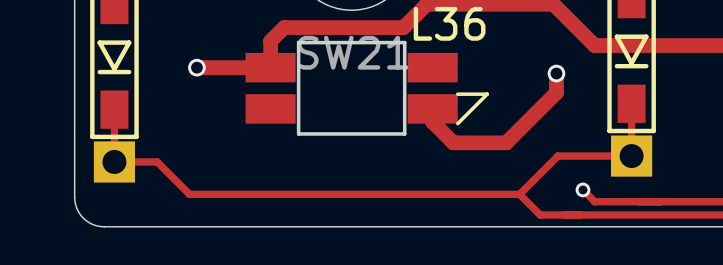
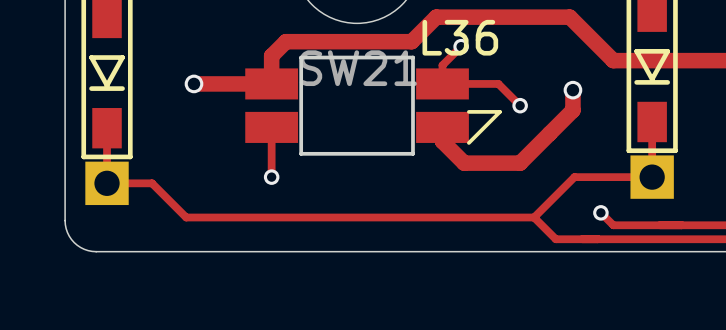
track: none -> (461, 46) (442, 65) (442, 83) (498, 83) (520, 105)
via: none -> (461, 46)
via: none -> (520, 105)
track: none -> (271, 127) (271, 177)
via: none -> (271, 177)

